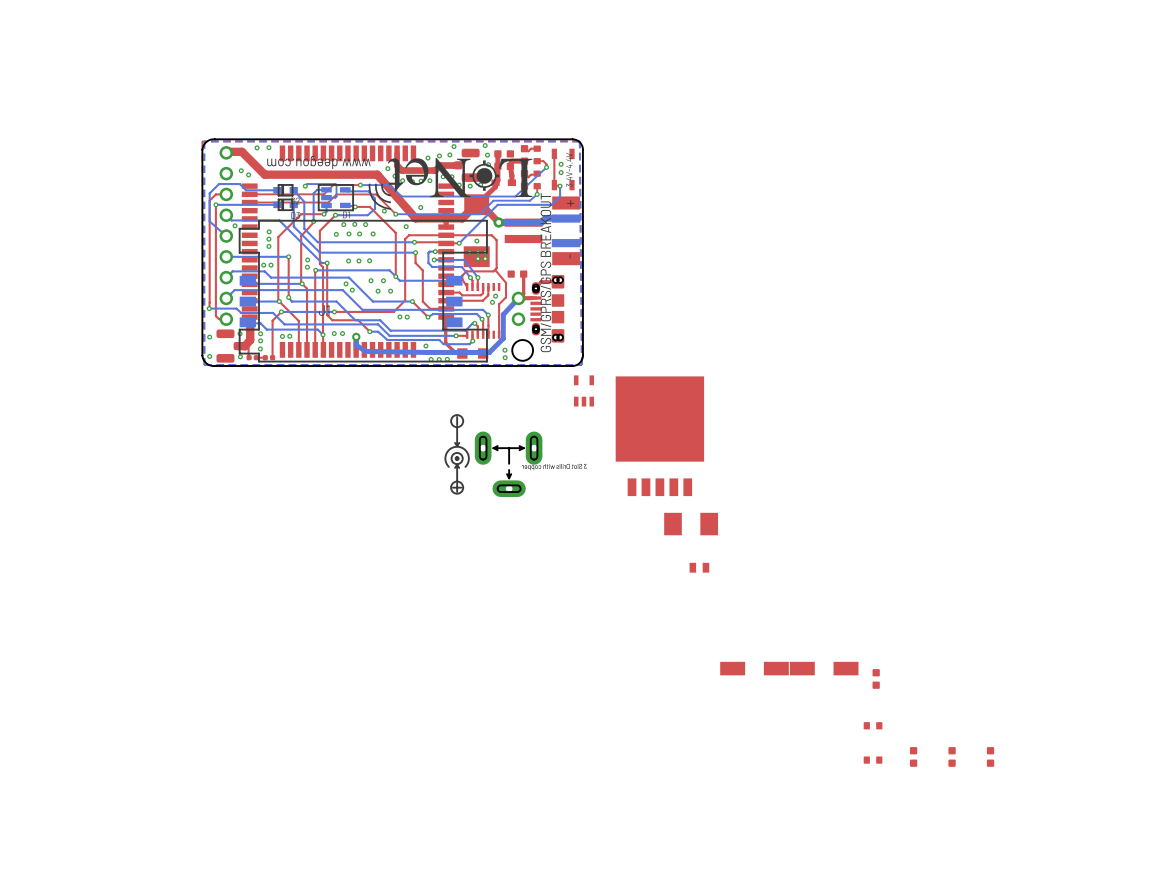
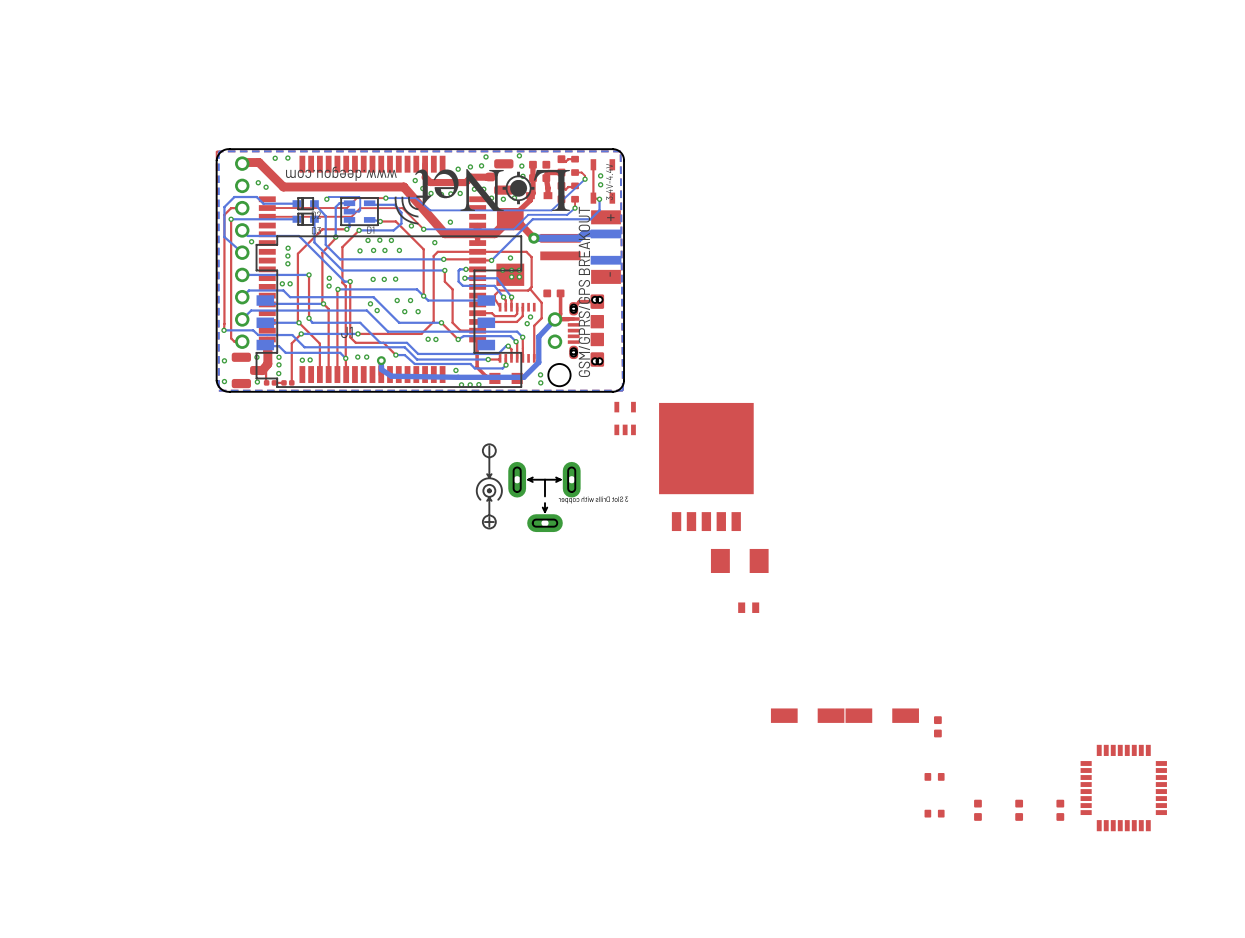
part: none -> (1123, 788)

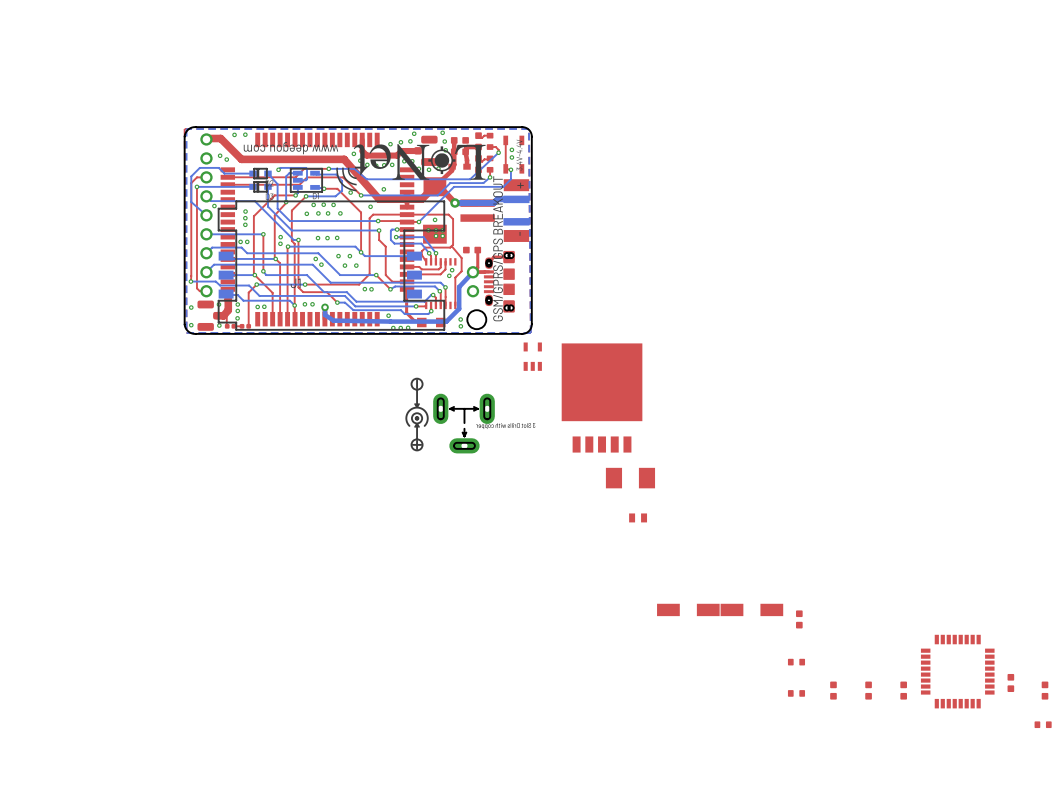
part: none -> (1010, 682)
part: none -> (1045, 690)
part: none -> (1043, 724)

